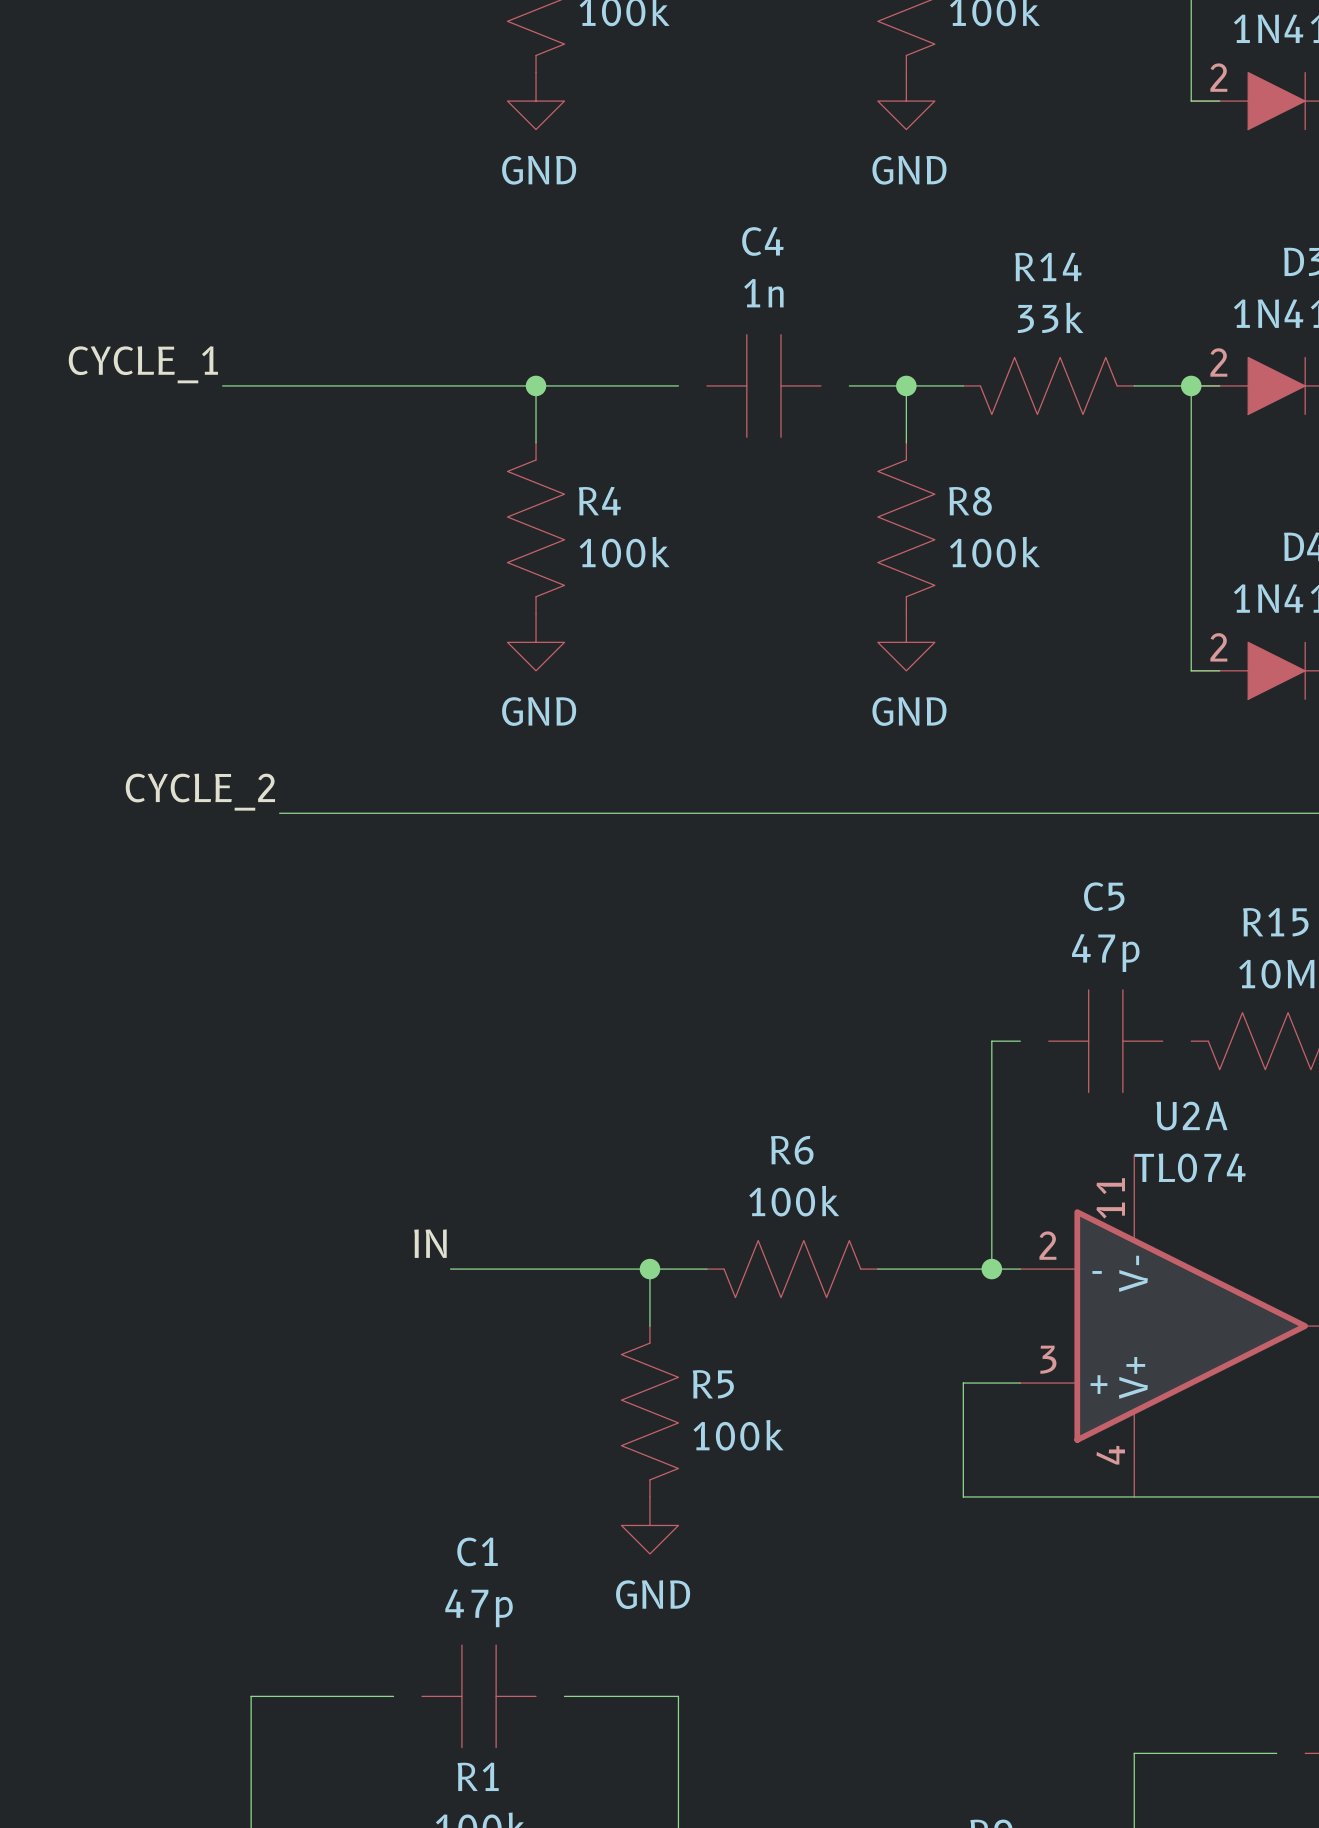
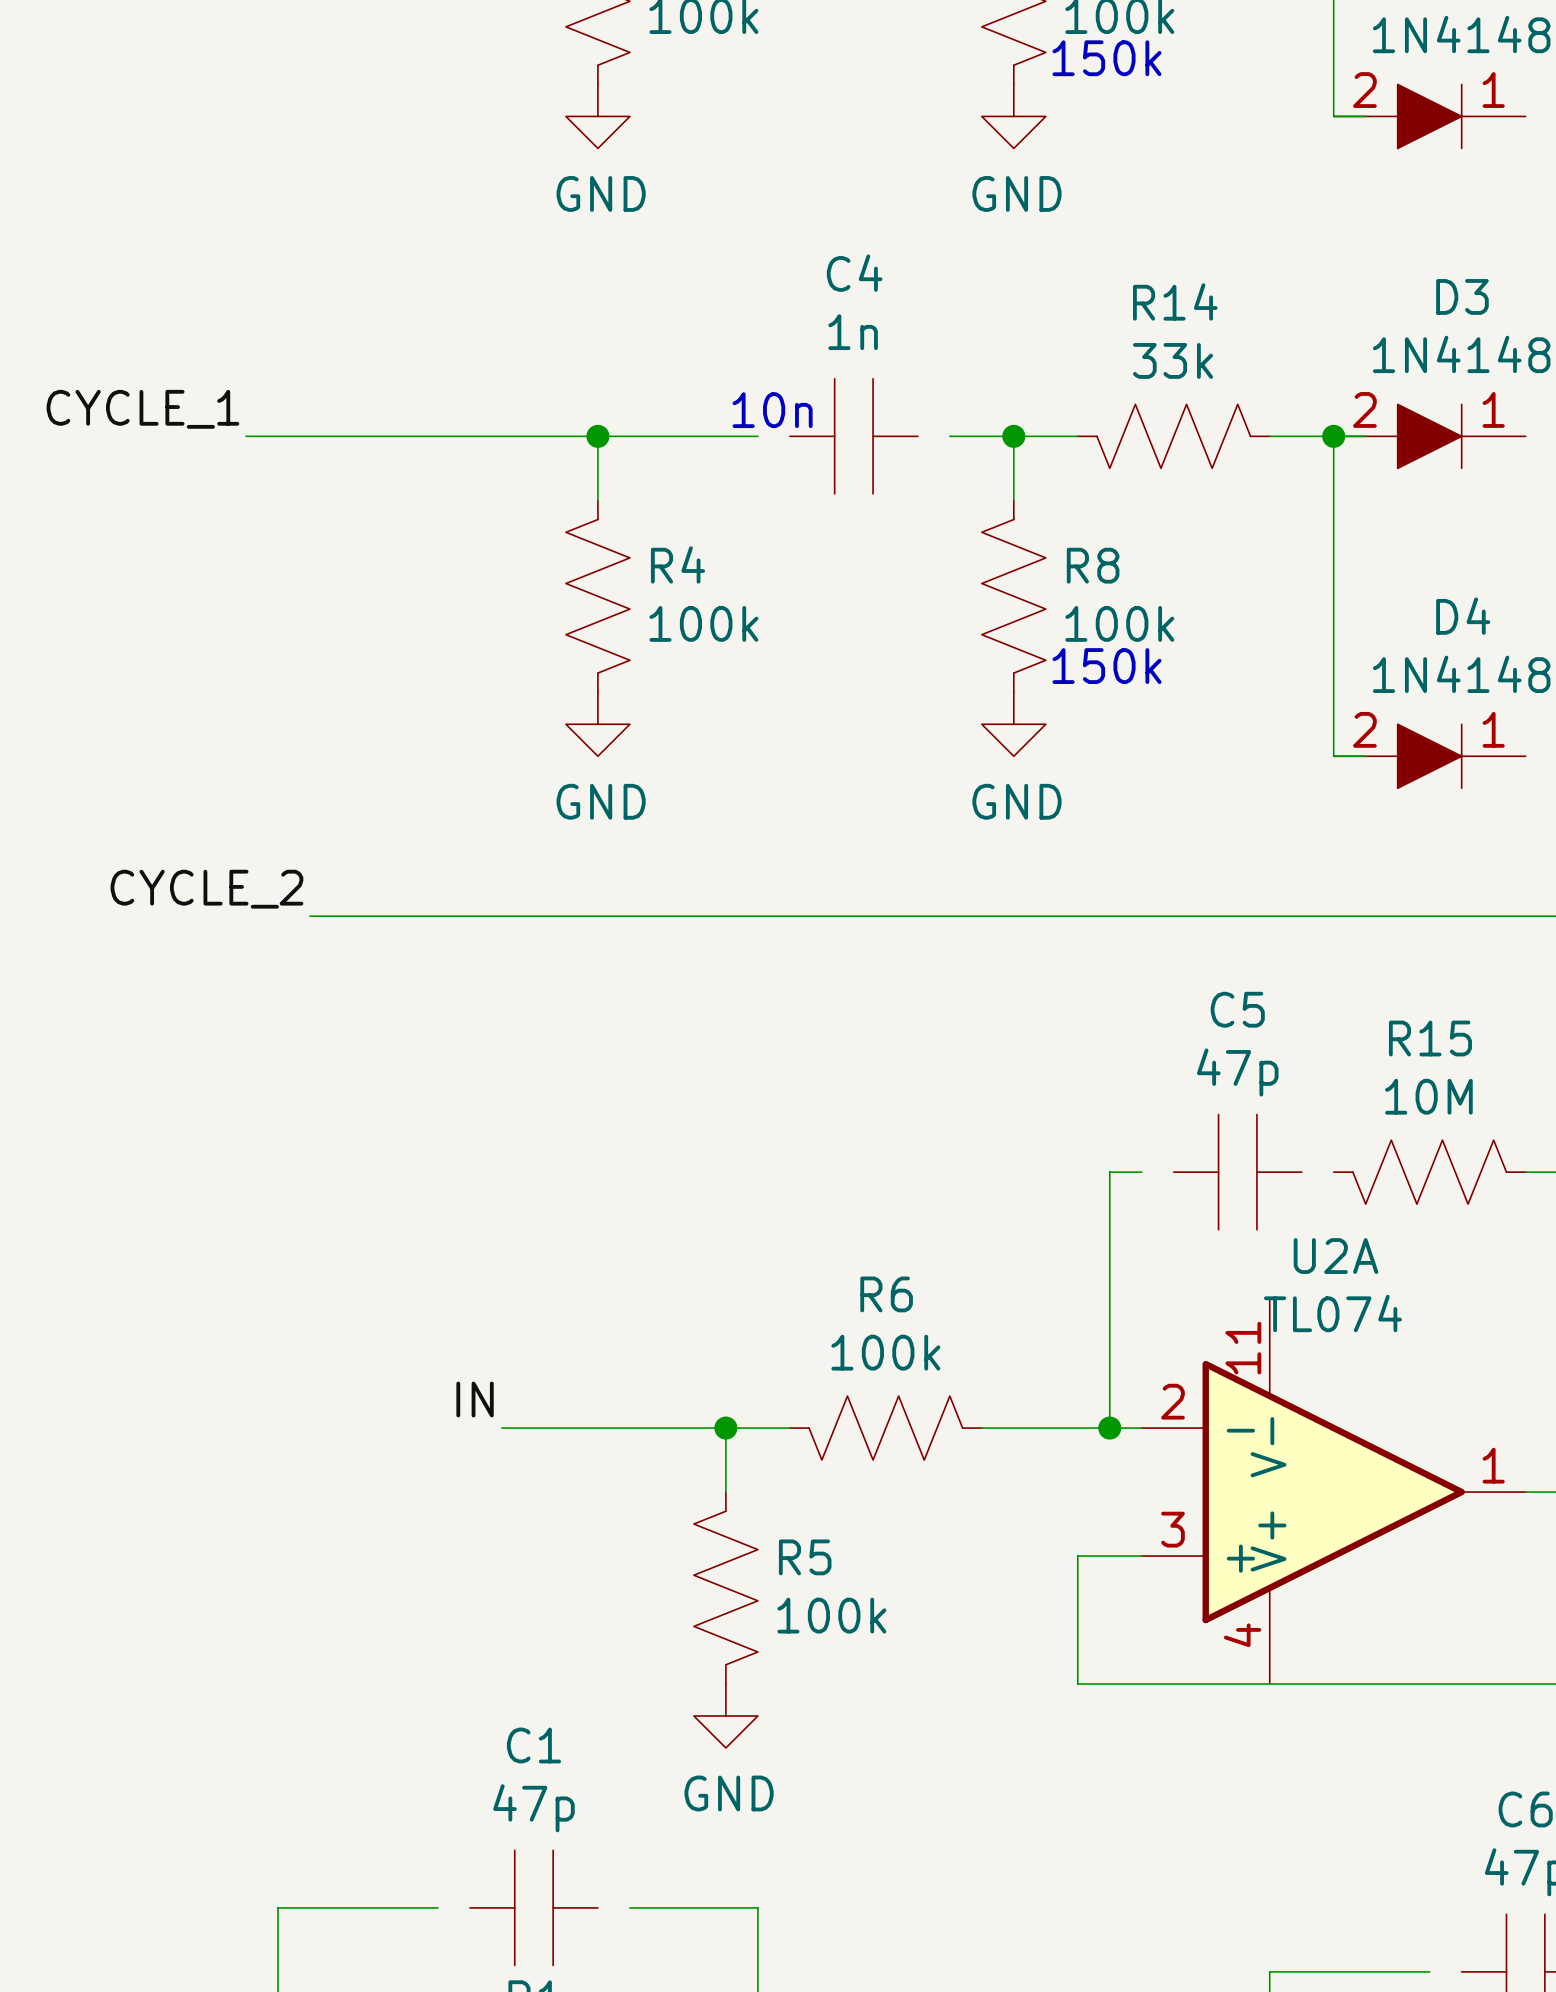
text: none -> 150k (1106, 58)
text: none -> 10n (772, 410)
text: none -> 150k (1106, 666)

